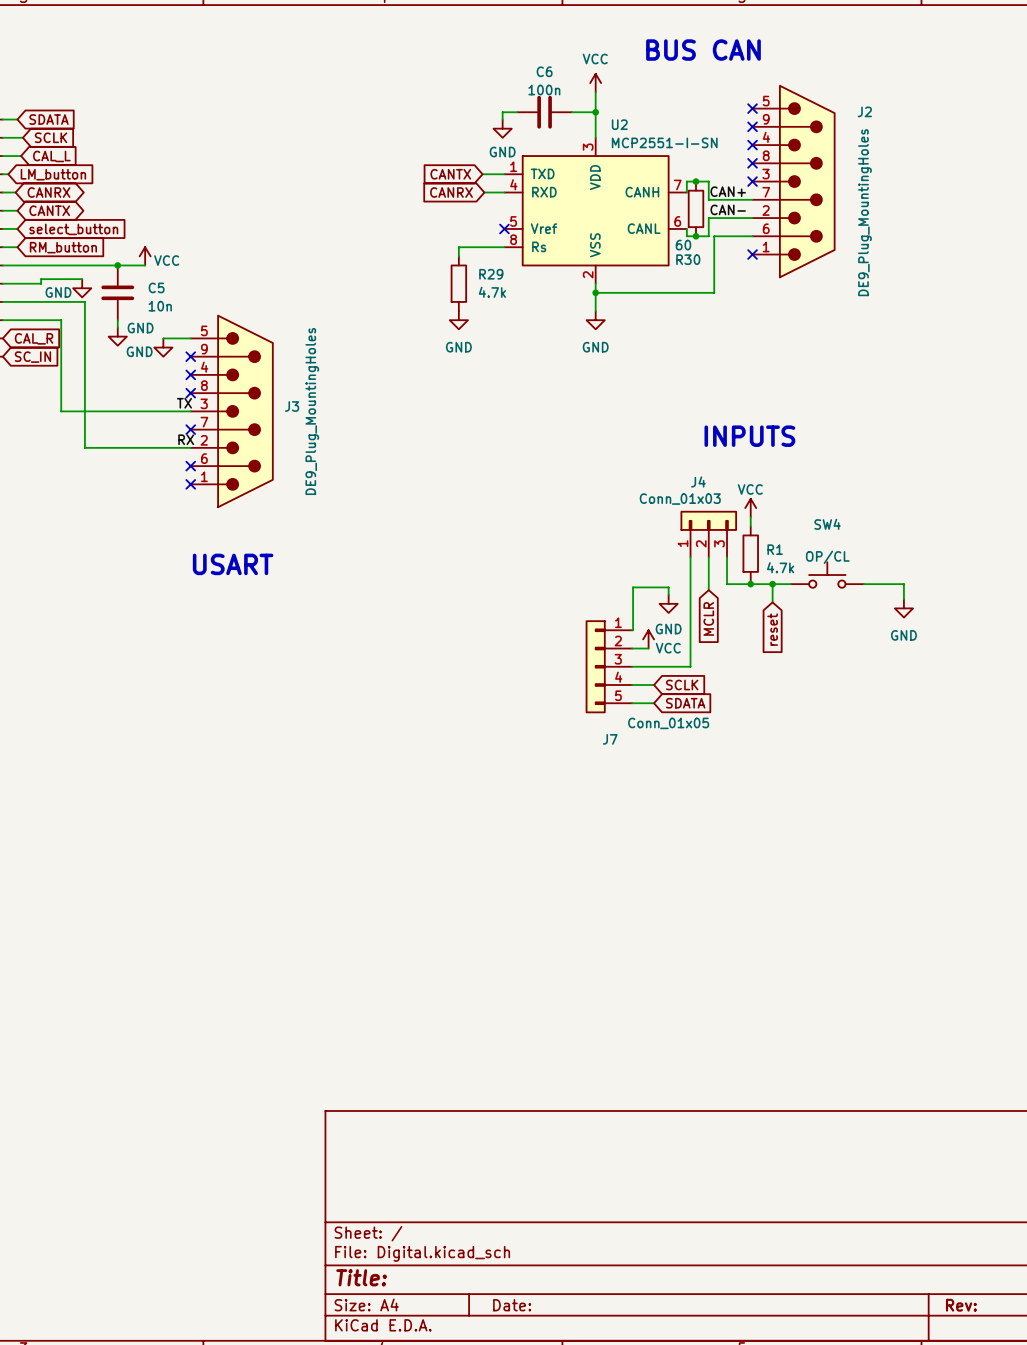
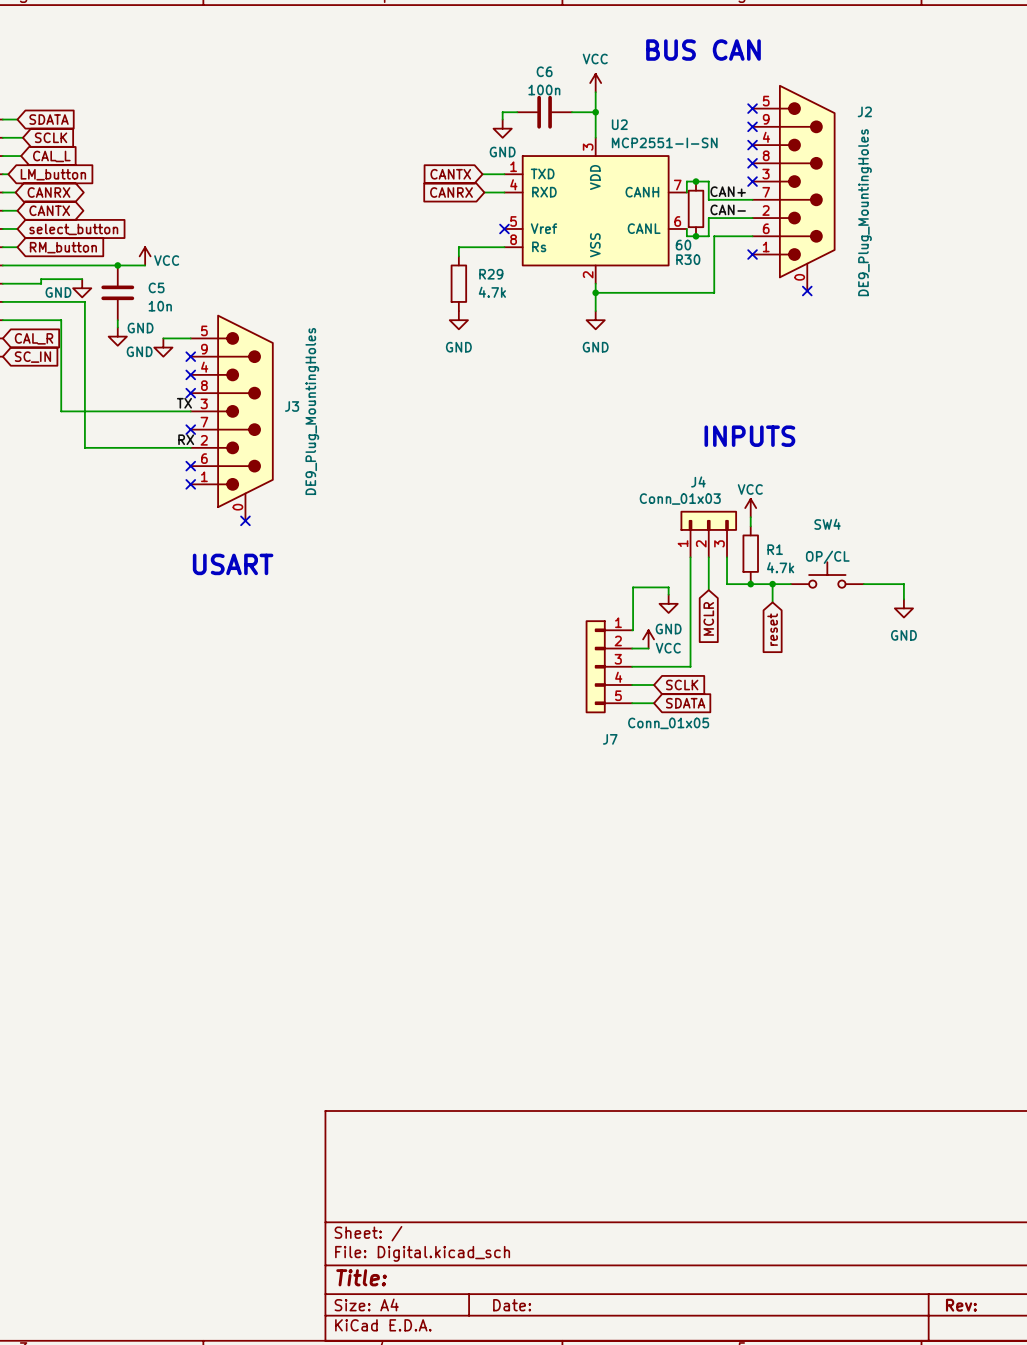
J2 symbol: [752, 84, 836, 279] -> [752, 84, 836, 292]
no-connect mark: none -> (807, 291)
J3 symbol: [190, 314, 274, 509] -> [190, 314, 274, 521]
no-connect mark: none -> (245, 520)

